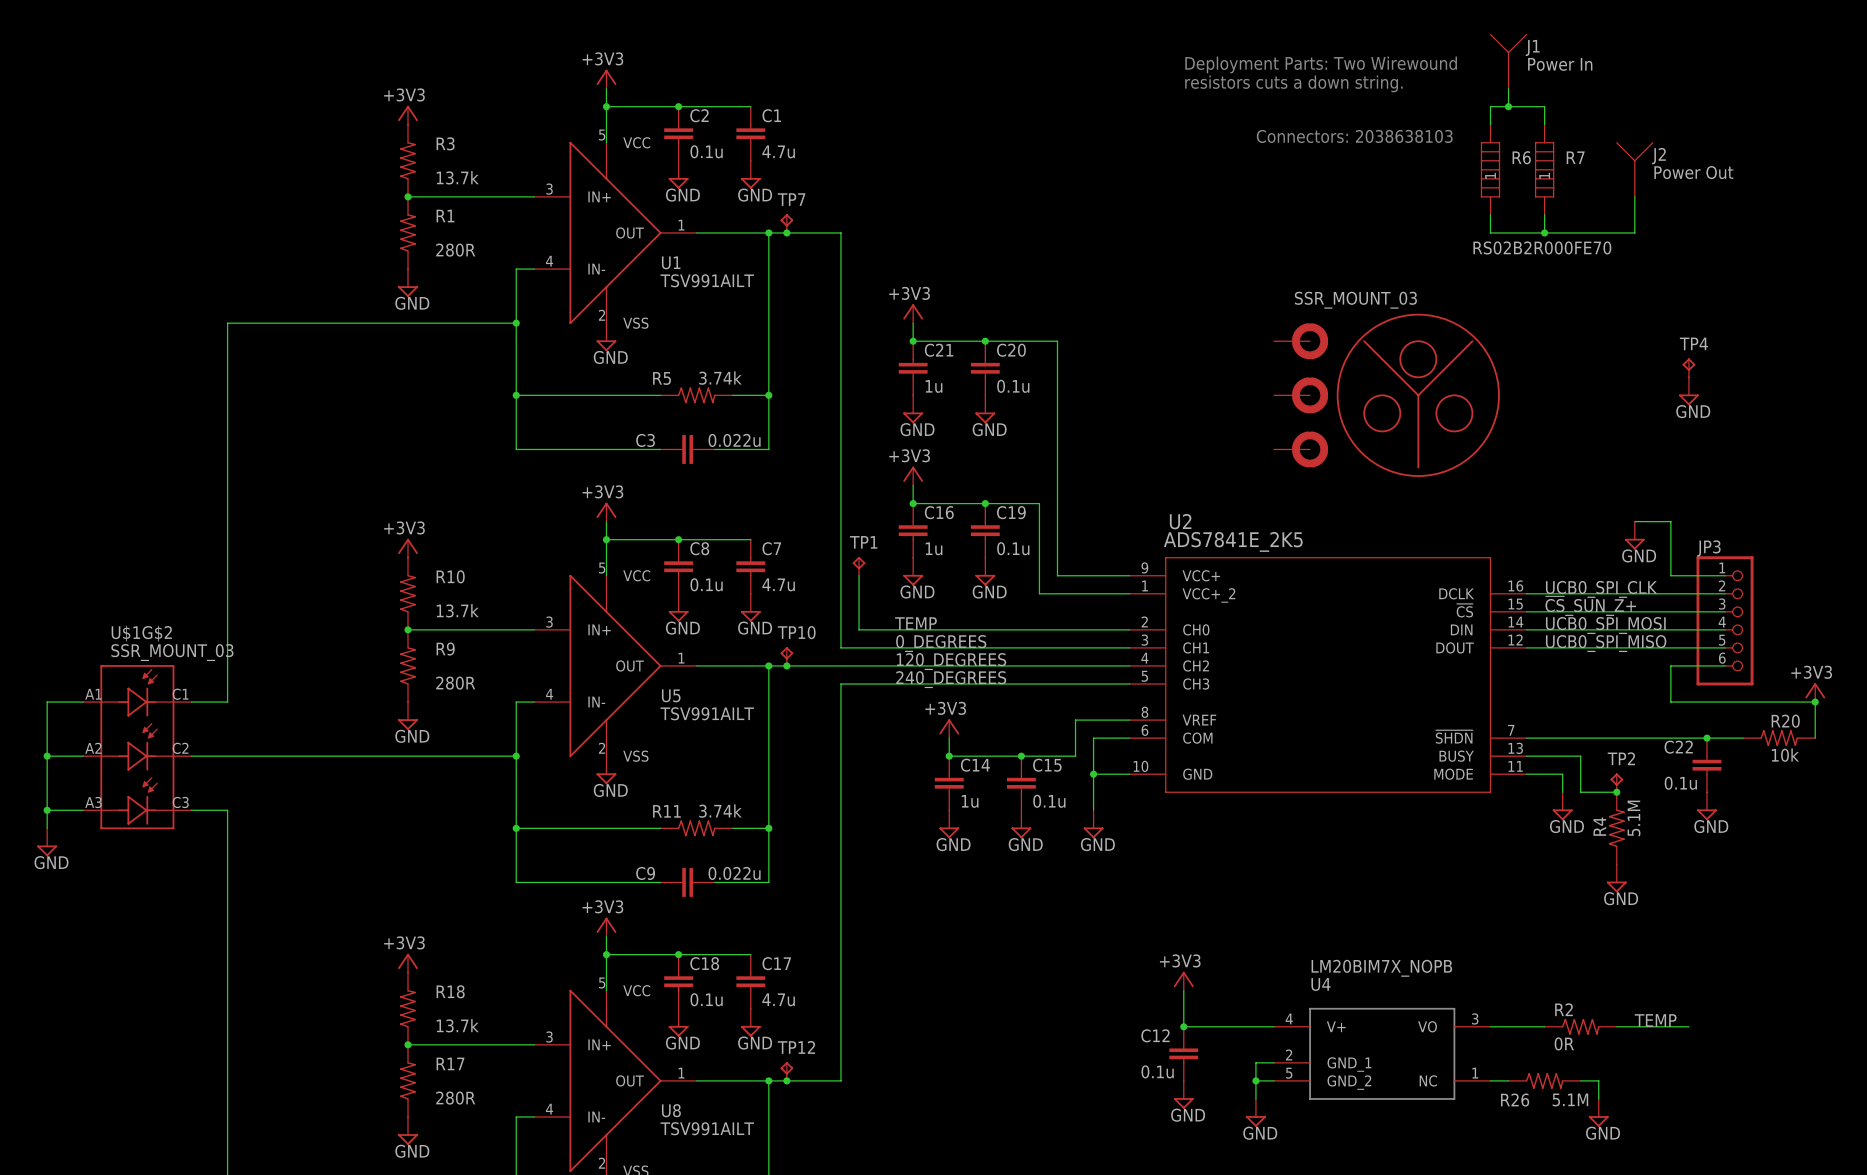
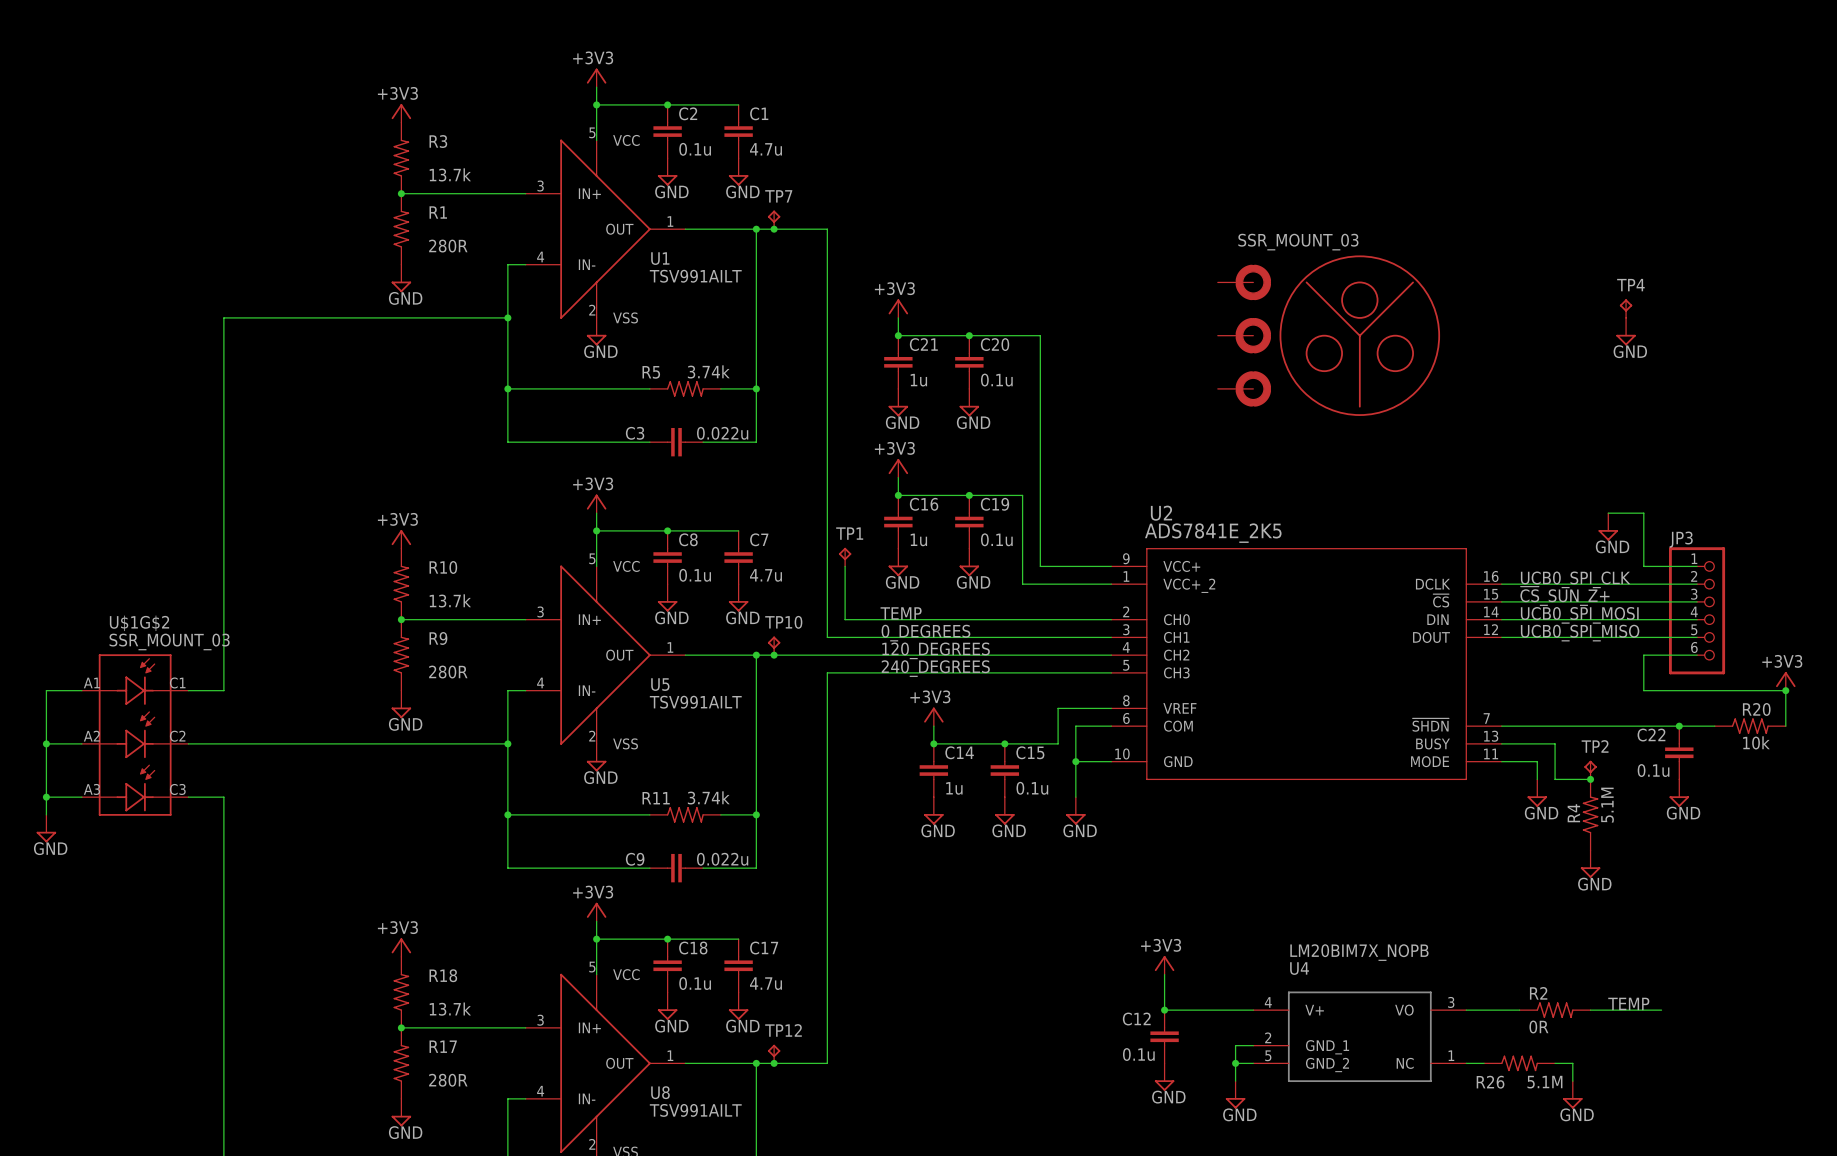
J1: Power In (1508, 61) -> none
text: Deployment Parts: Two Wirewound (1321, 64) -> none
text: resistors cuts a down string. (1293, 83) -> none
wire: (1508, 88) (1508, 106) -> none
junction: (1508, 106) -> none
wire: (1490, 124) (1490, 106) (1544, 106) (1544, 124) -> none
text: Connectors: 2038638103 (1354, 136) -> none
R6: RS02B2R000FE70 (1490, 169) -> none
R7: (1544, 169) -> none
J2: Power Out (1634, 169) -> none
wire: (1634, 196) (1634, 232) (1490, 232) (1490, 214) -> none
wire: (1544, 214) (1544, 232) -> none
junction: (1544, 232) -> none
TP4 position: (1688, 367) -> (1626, 308)
power symbol position: GND (1688, 391) -> GND (1626, 331)
part position: (1386, 395) -> (1328, 335)

